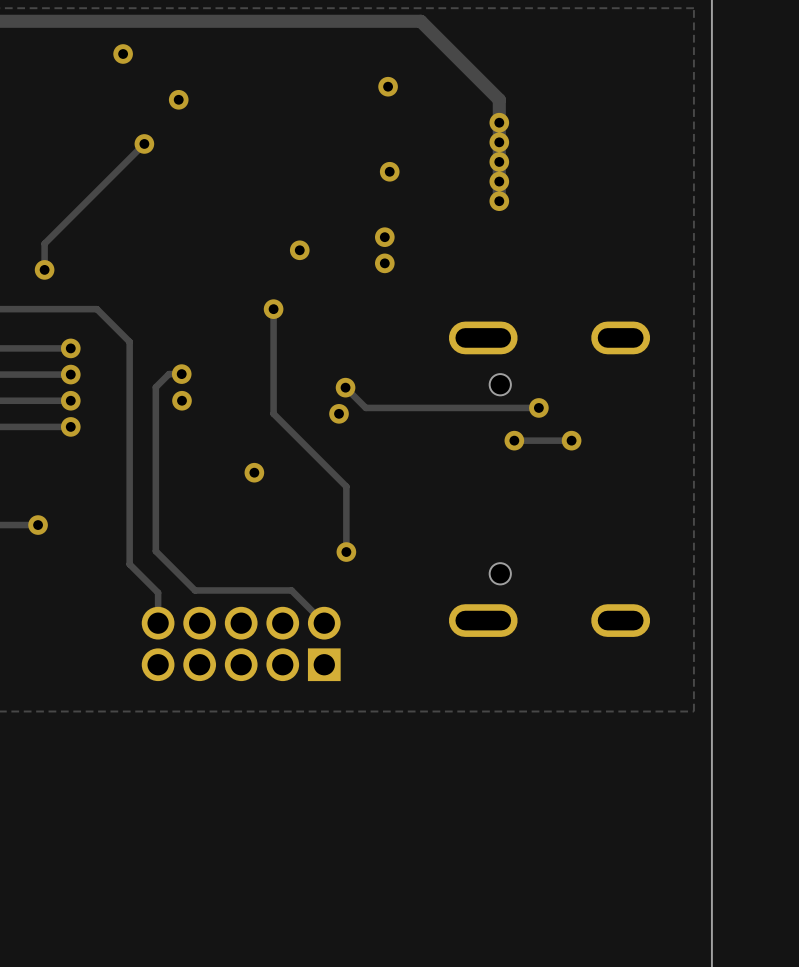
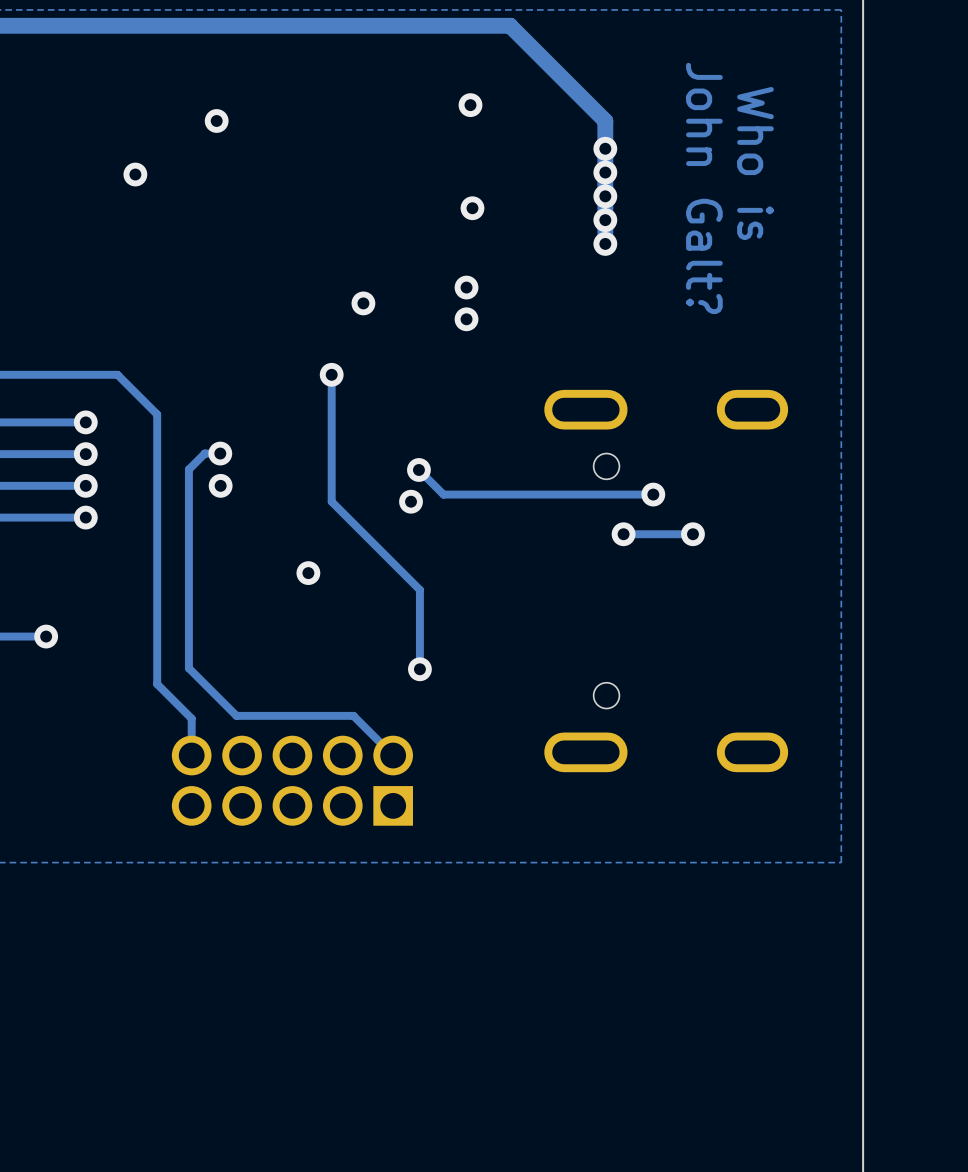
via: (123, 54) -> none
text: none -> Who is (755, 163)
text: none -> John Galt? (704, 188)
track: (144, 143) (44, 243) (44, 269) -> none
via position: (144, 143) -> (135, 174)
via: (44, 269) -> none

